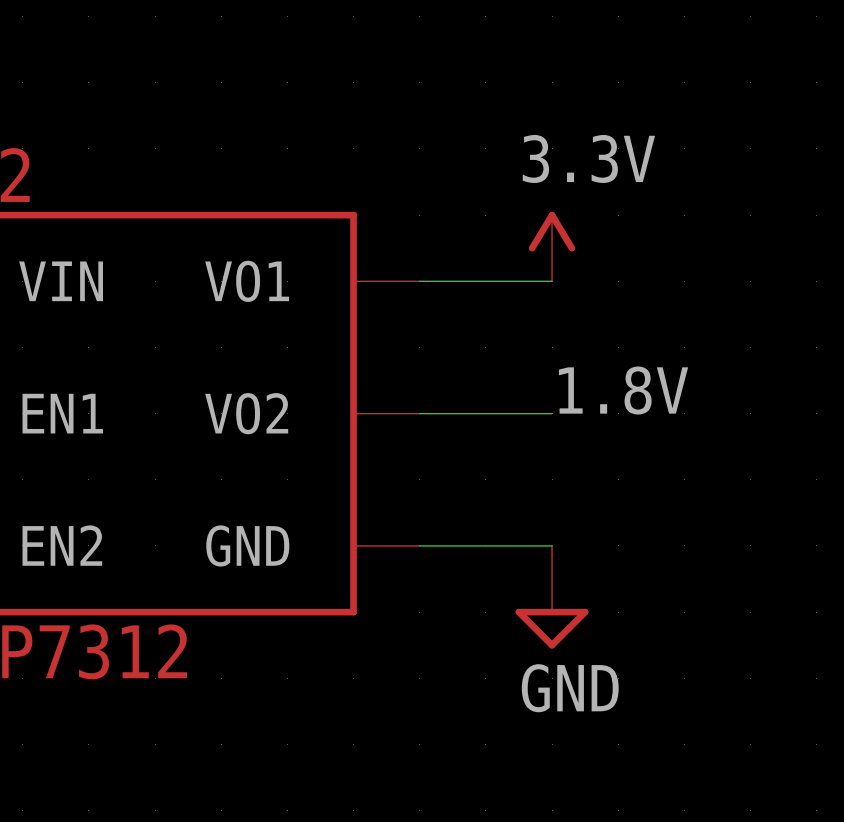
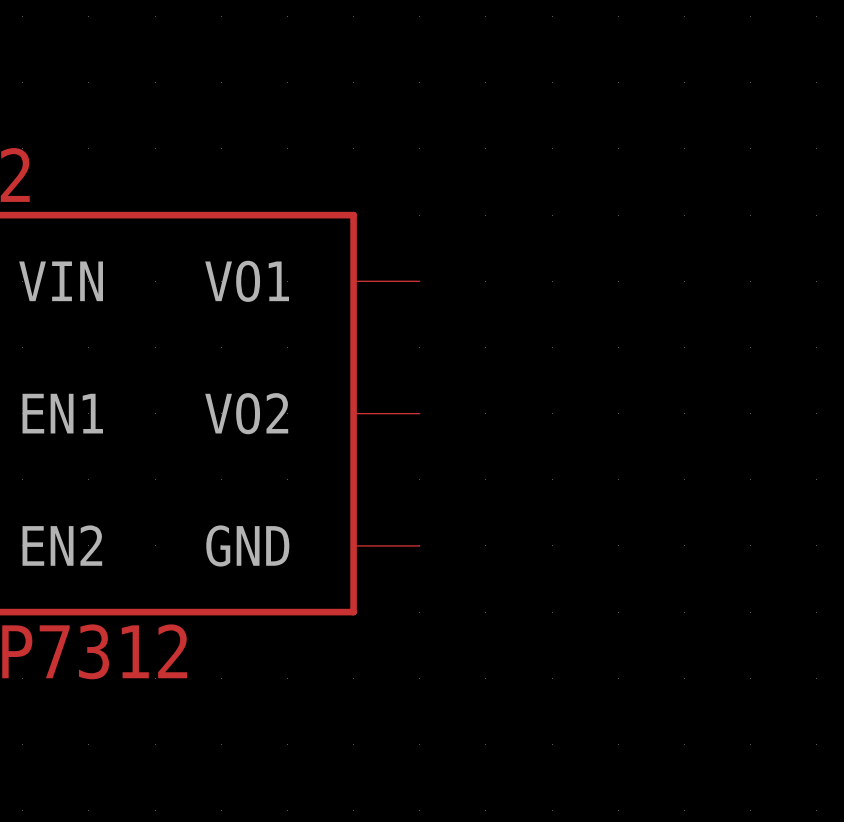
power symbol: 3.3V (552, 246) -> none
wire: (419, 281) (552, 281) -> none
label: 1.8V (623, 390) -> none
wire: (419, 413) (552, 413) -> none
wire: (419, 545) (552, 545) -> none
power symbol: GND (552, 597) -> none

